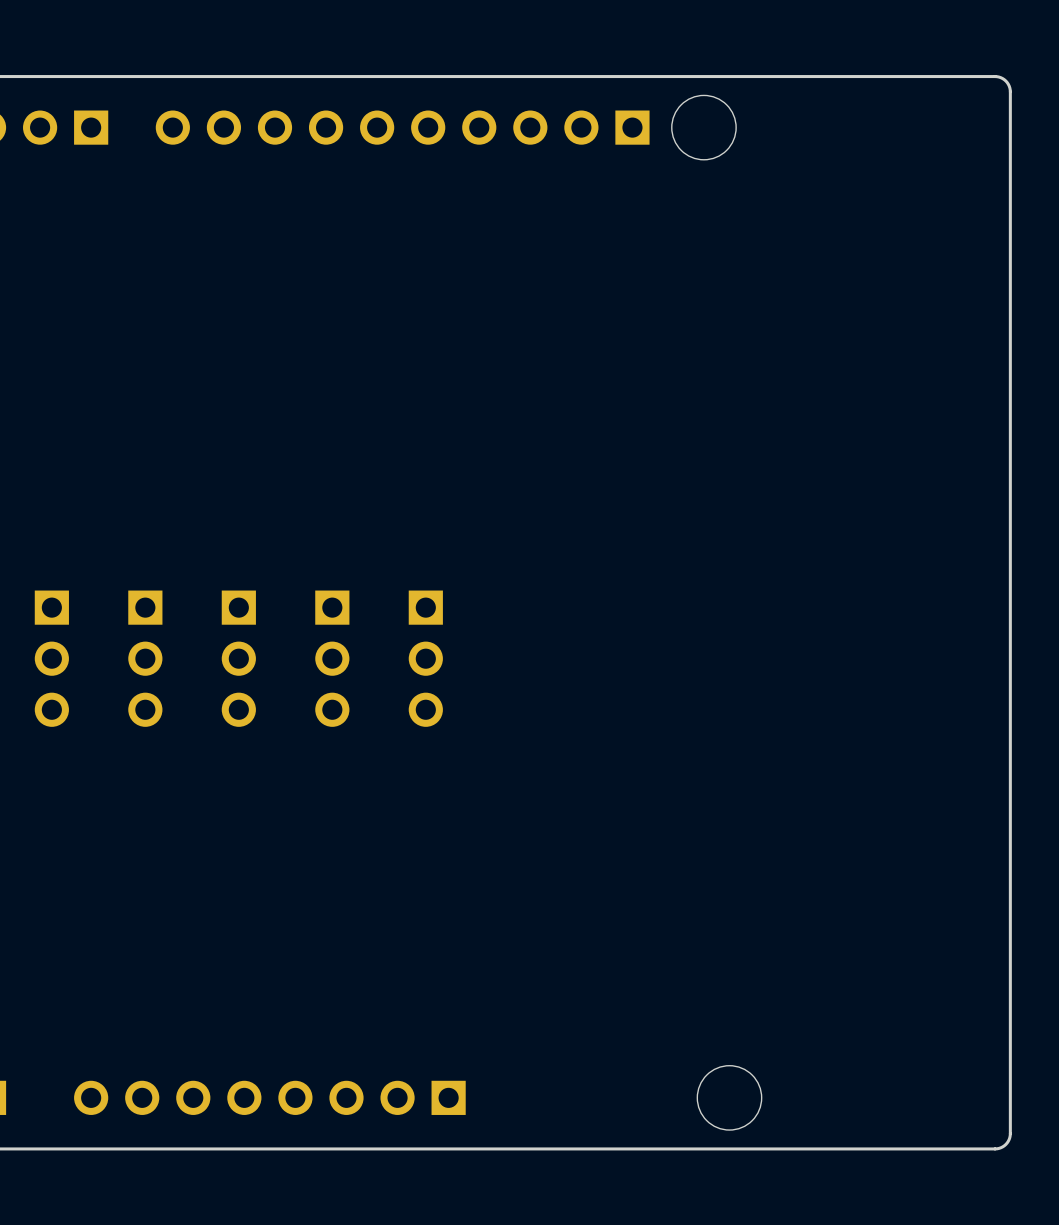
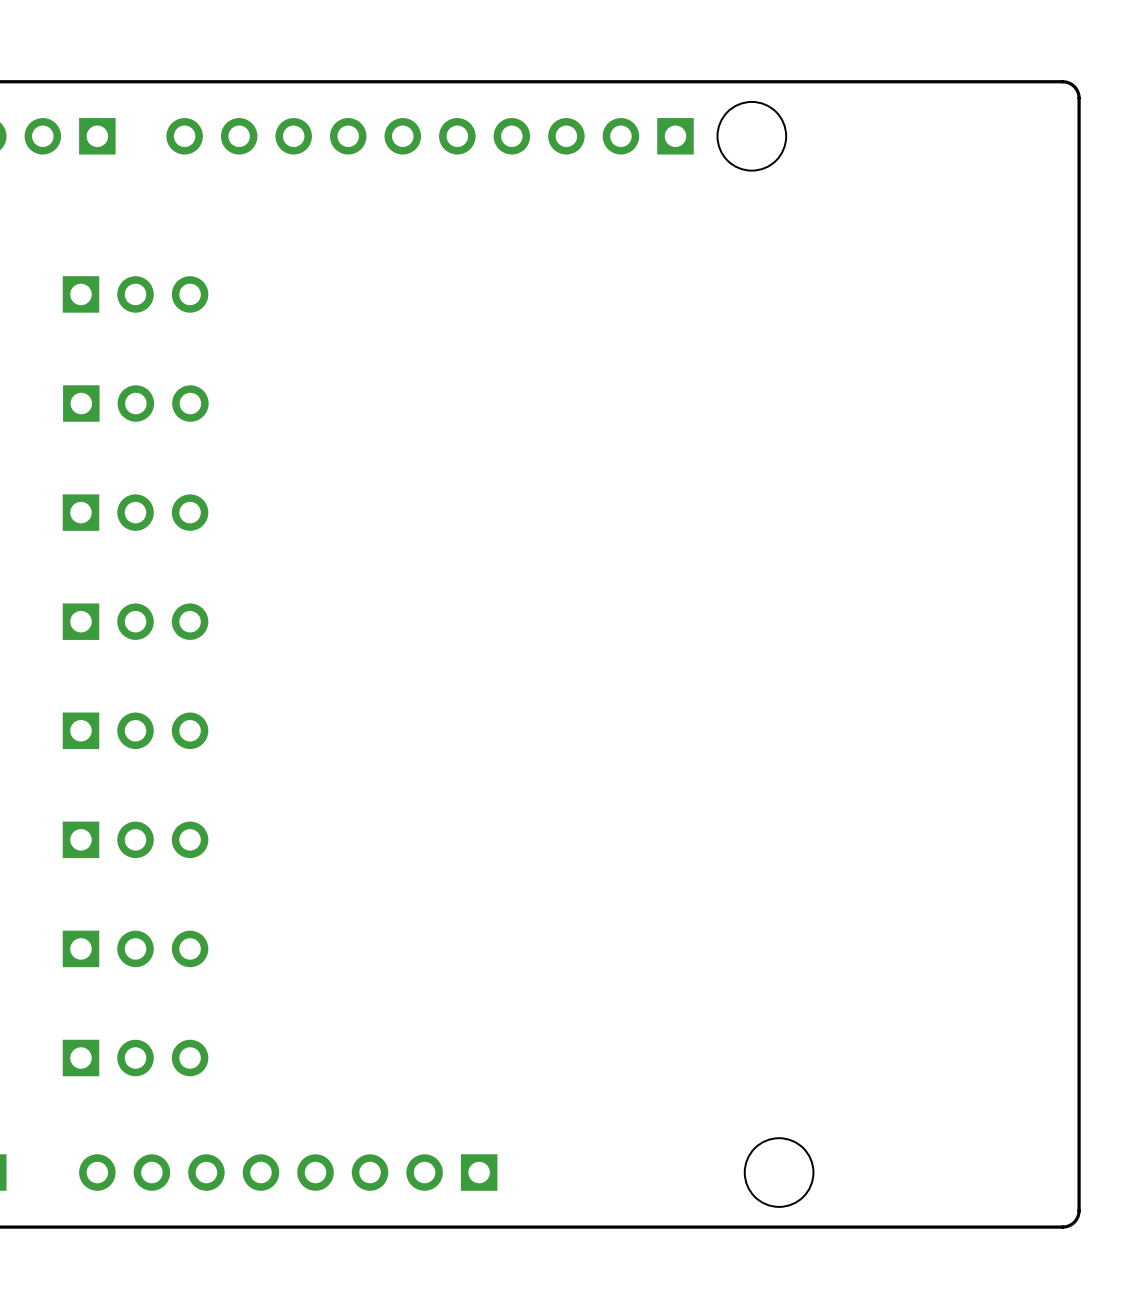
part: none -> (135, 294)
part: none -> (135, 403)
part: none -> (135, 512)
part: none -> (135, 621)
part: (51, 658) -> none
part rotation: 0° (145, 658) -> 90° counterclockwise (135, 730)
part: (238, 658) -> none
part: (332, 658) -> none
part: (425, 658) -> none
part: none -> (135, 839)
part: none -> (135, 948)
part: none -> (135, 1058)

